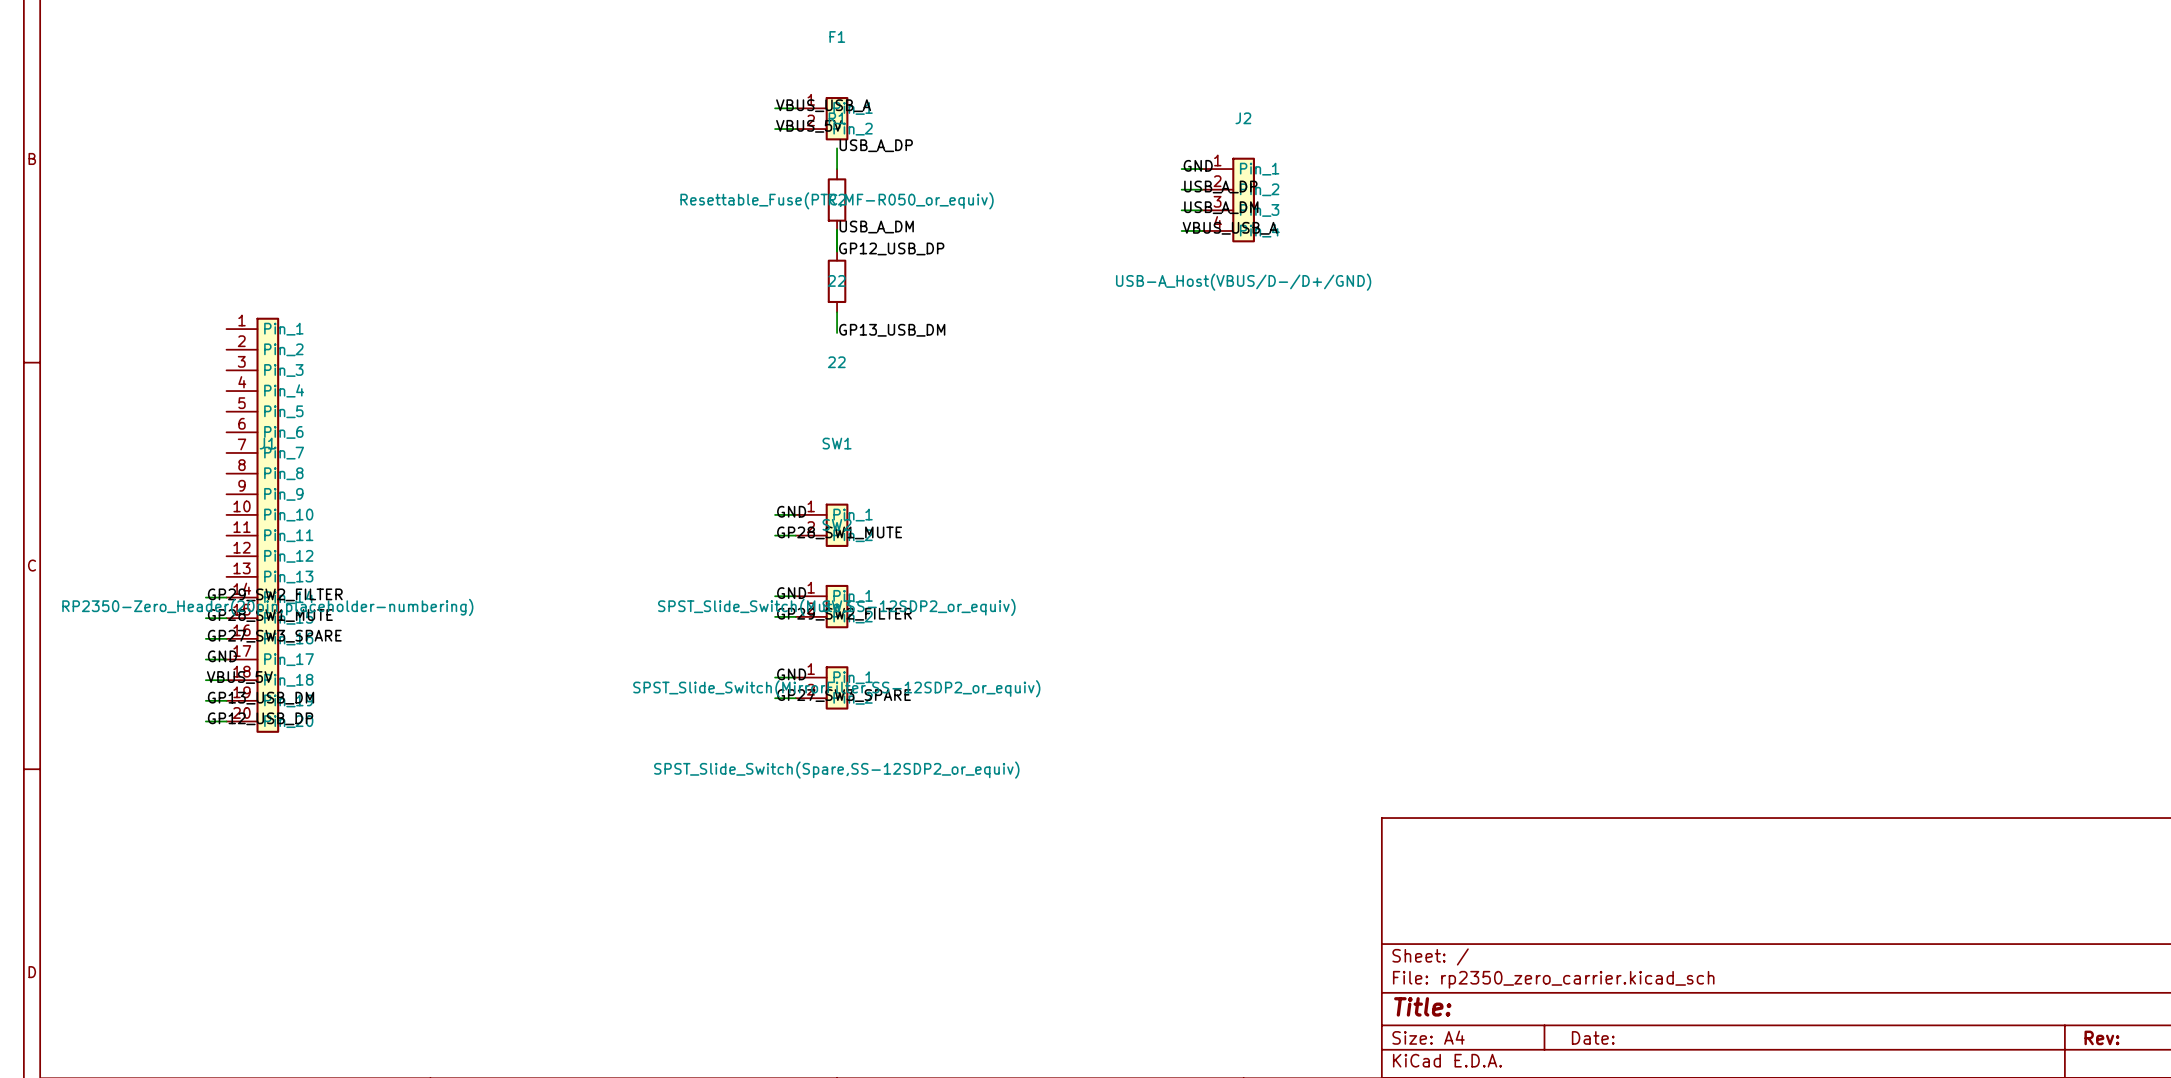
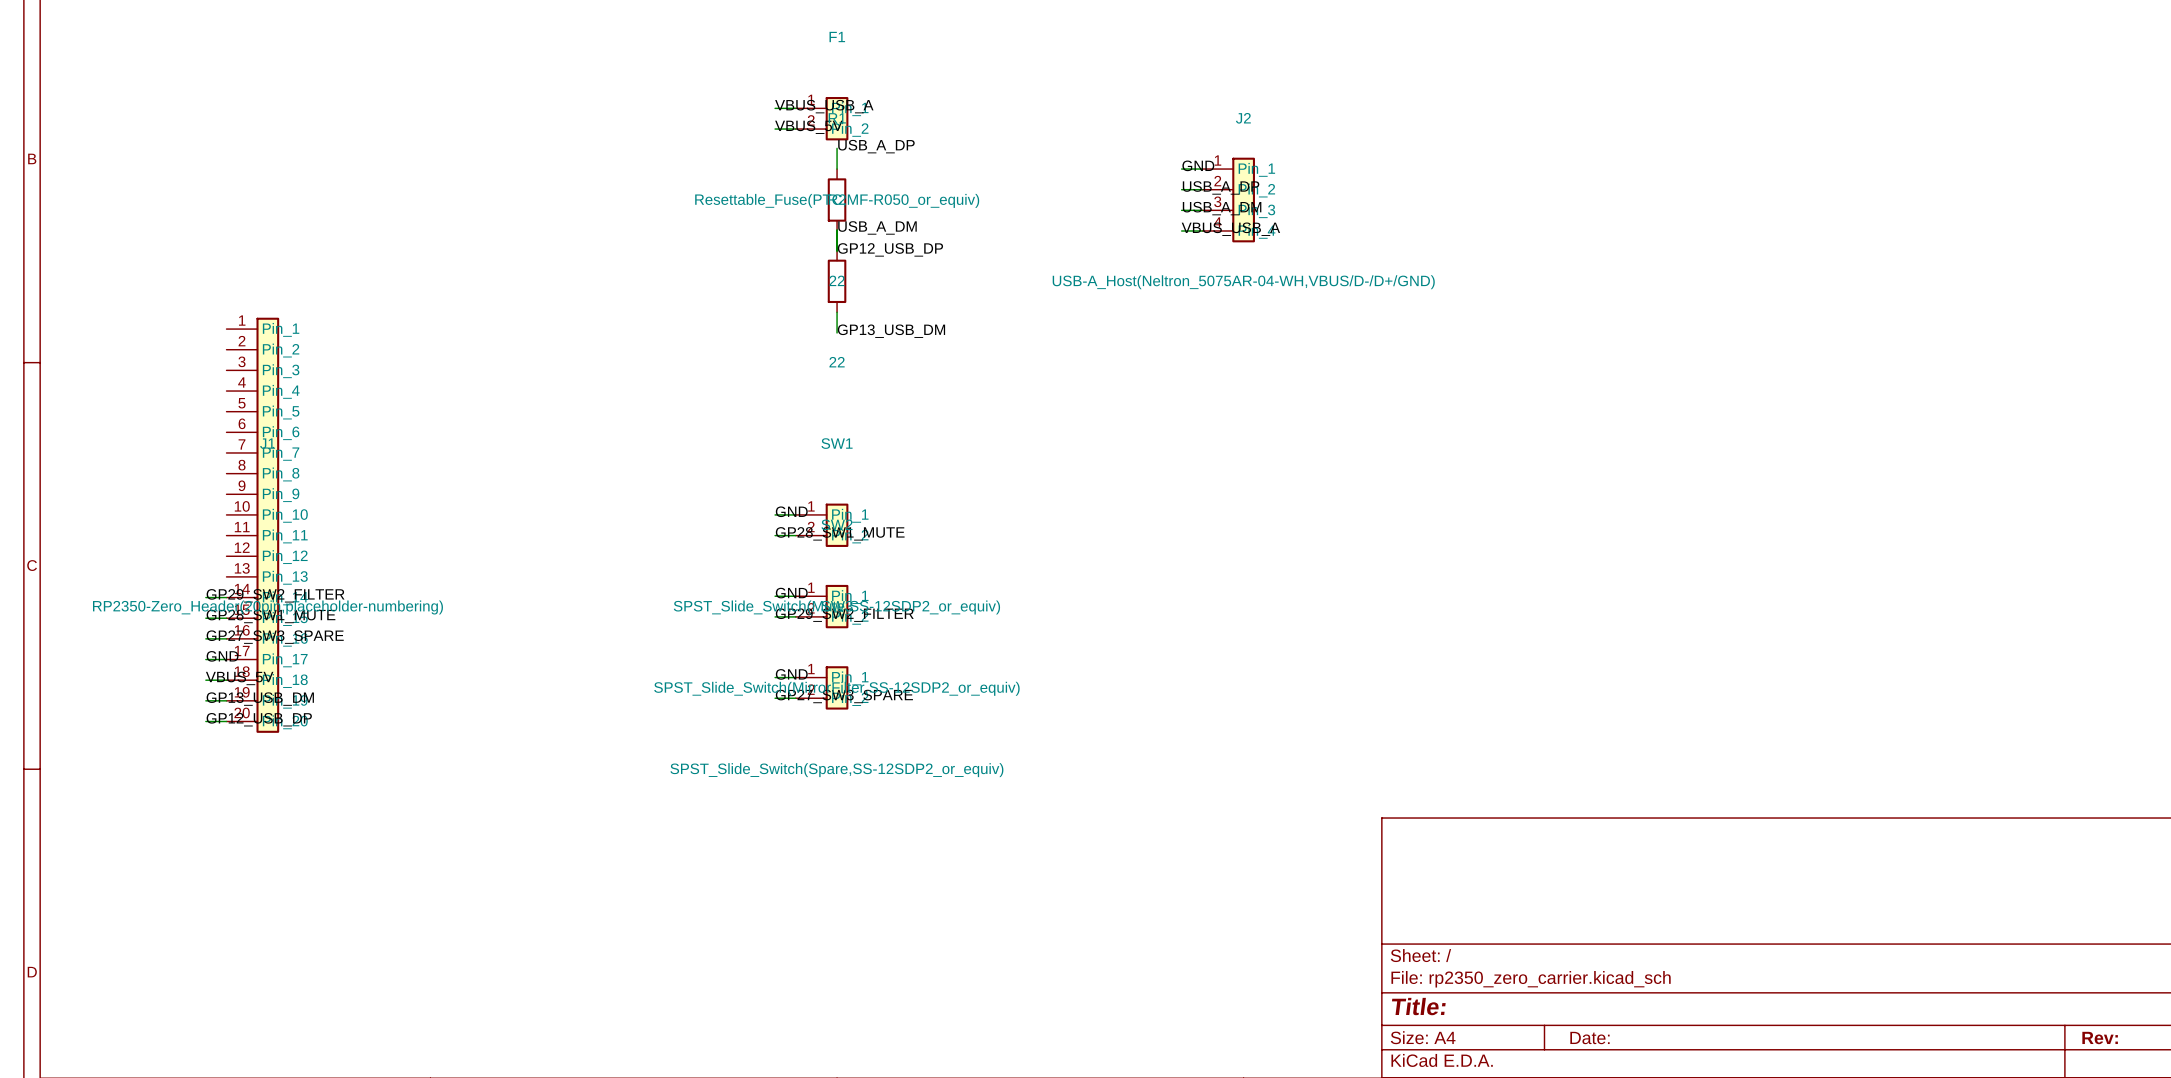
J2 value: USB-A_Host(VBUS/D-/D+/GND) (1243, 282) -> USB-A_Host(Neltron_5075AR-04-WH,VBUS/D-/D+/GND) (1243, 282)

